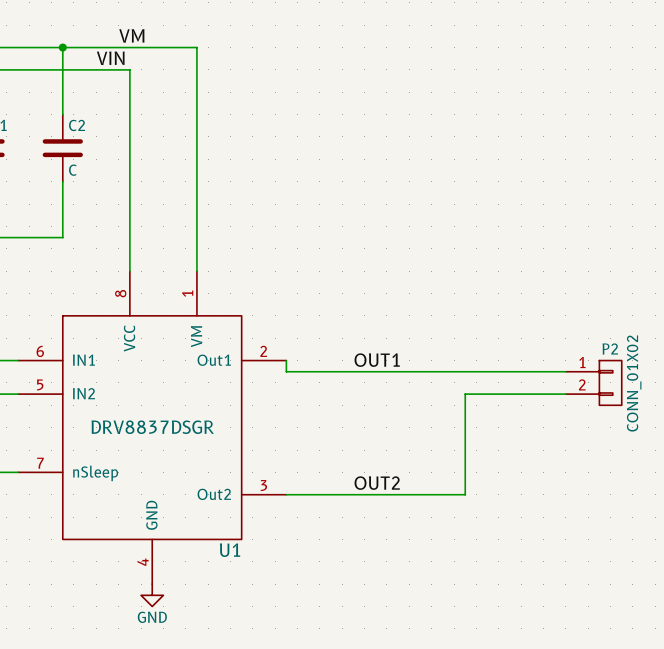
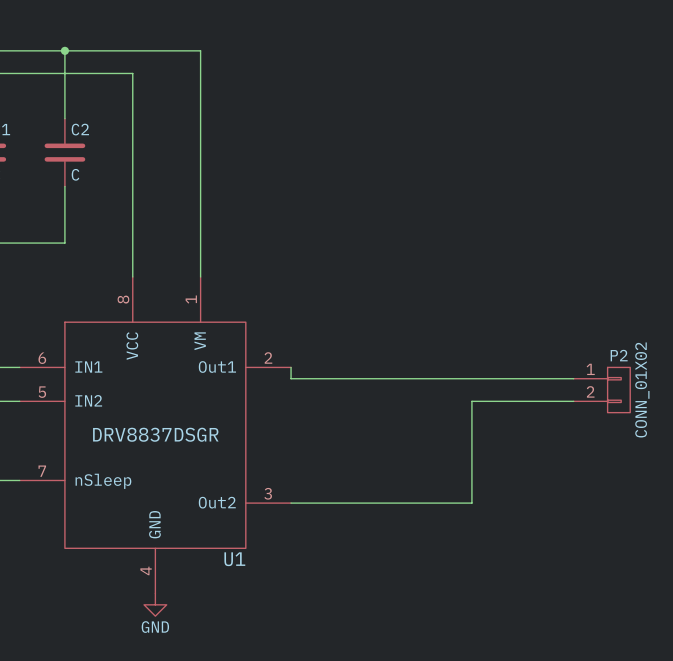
label: VM (131, 35) -> none
label: VIN (110, 58) -> none
label: OUT1 (377, 360) -> none
label: OUT2 (377, 483) -> none

